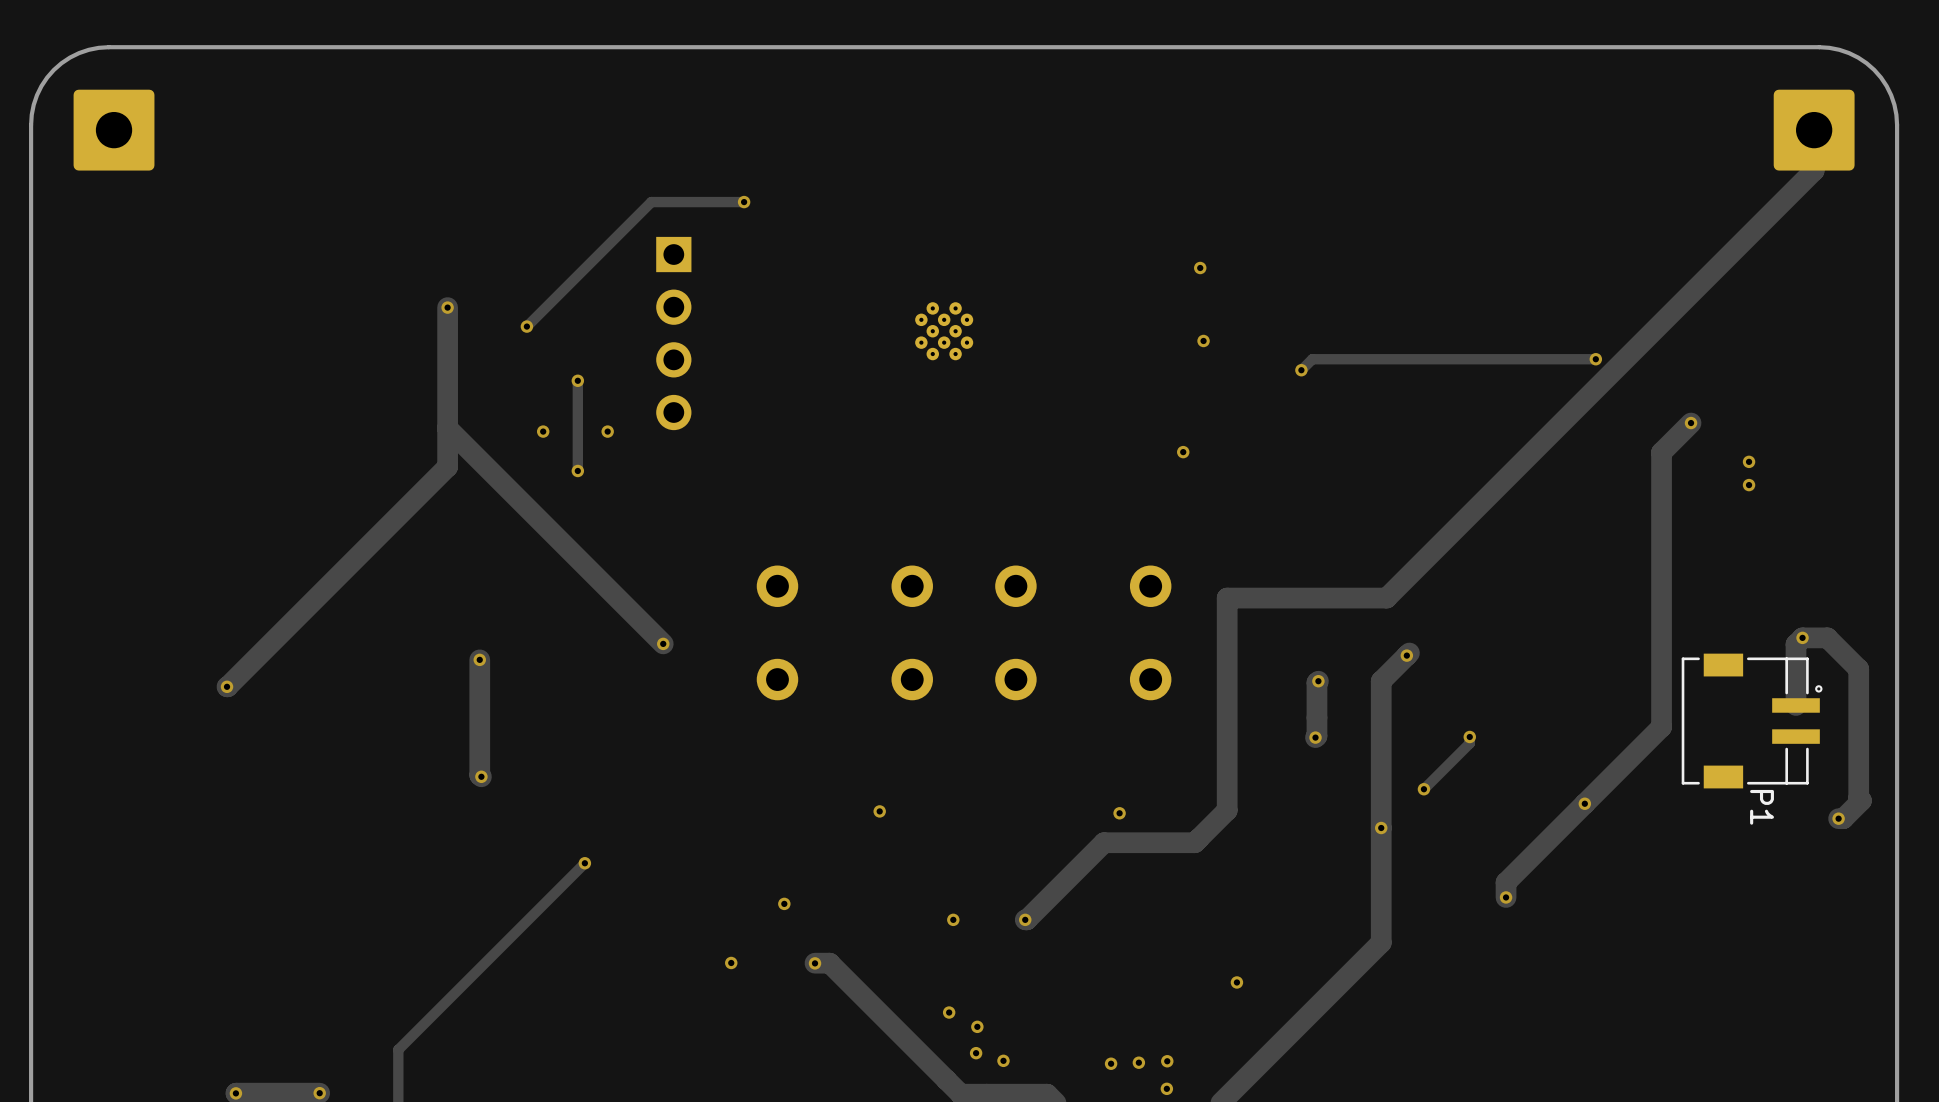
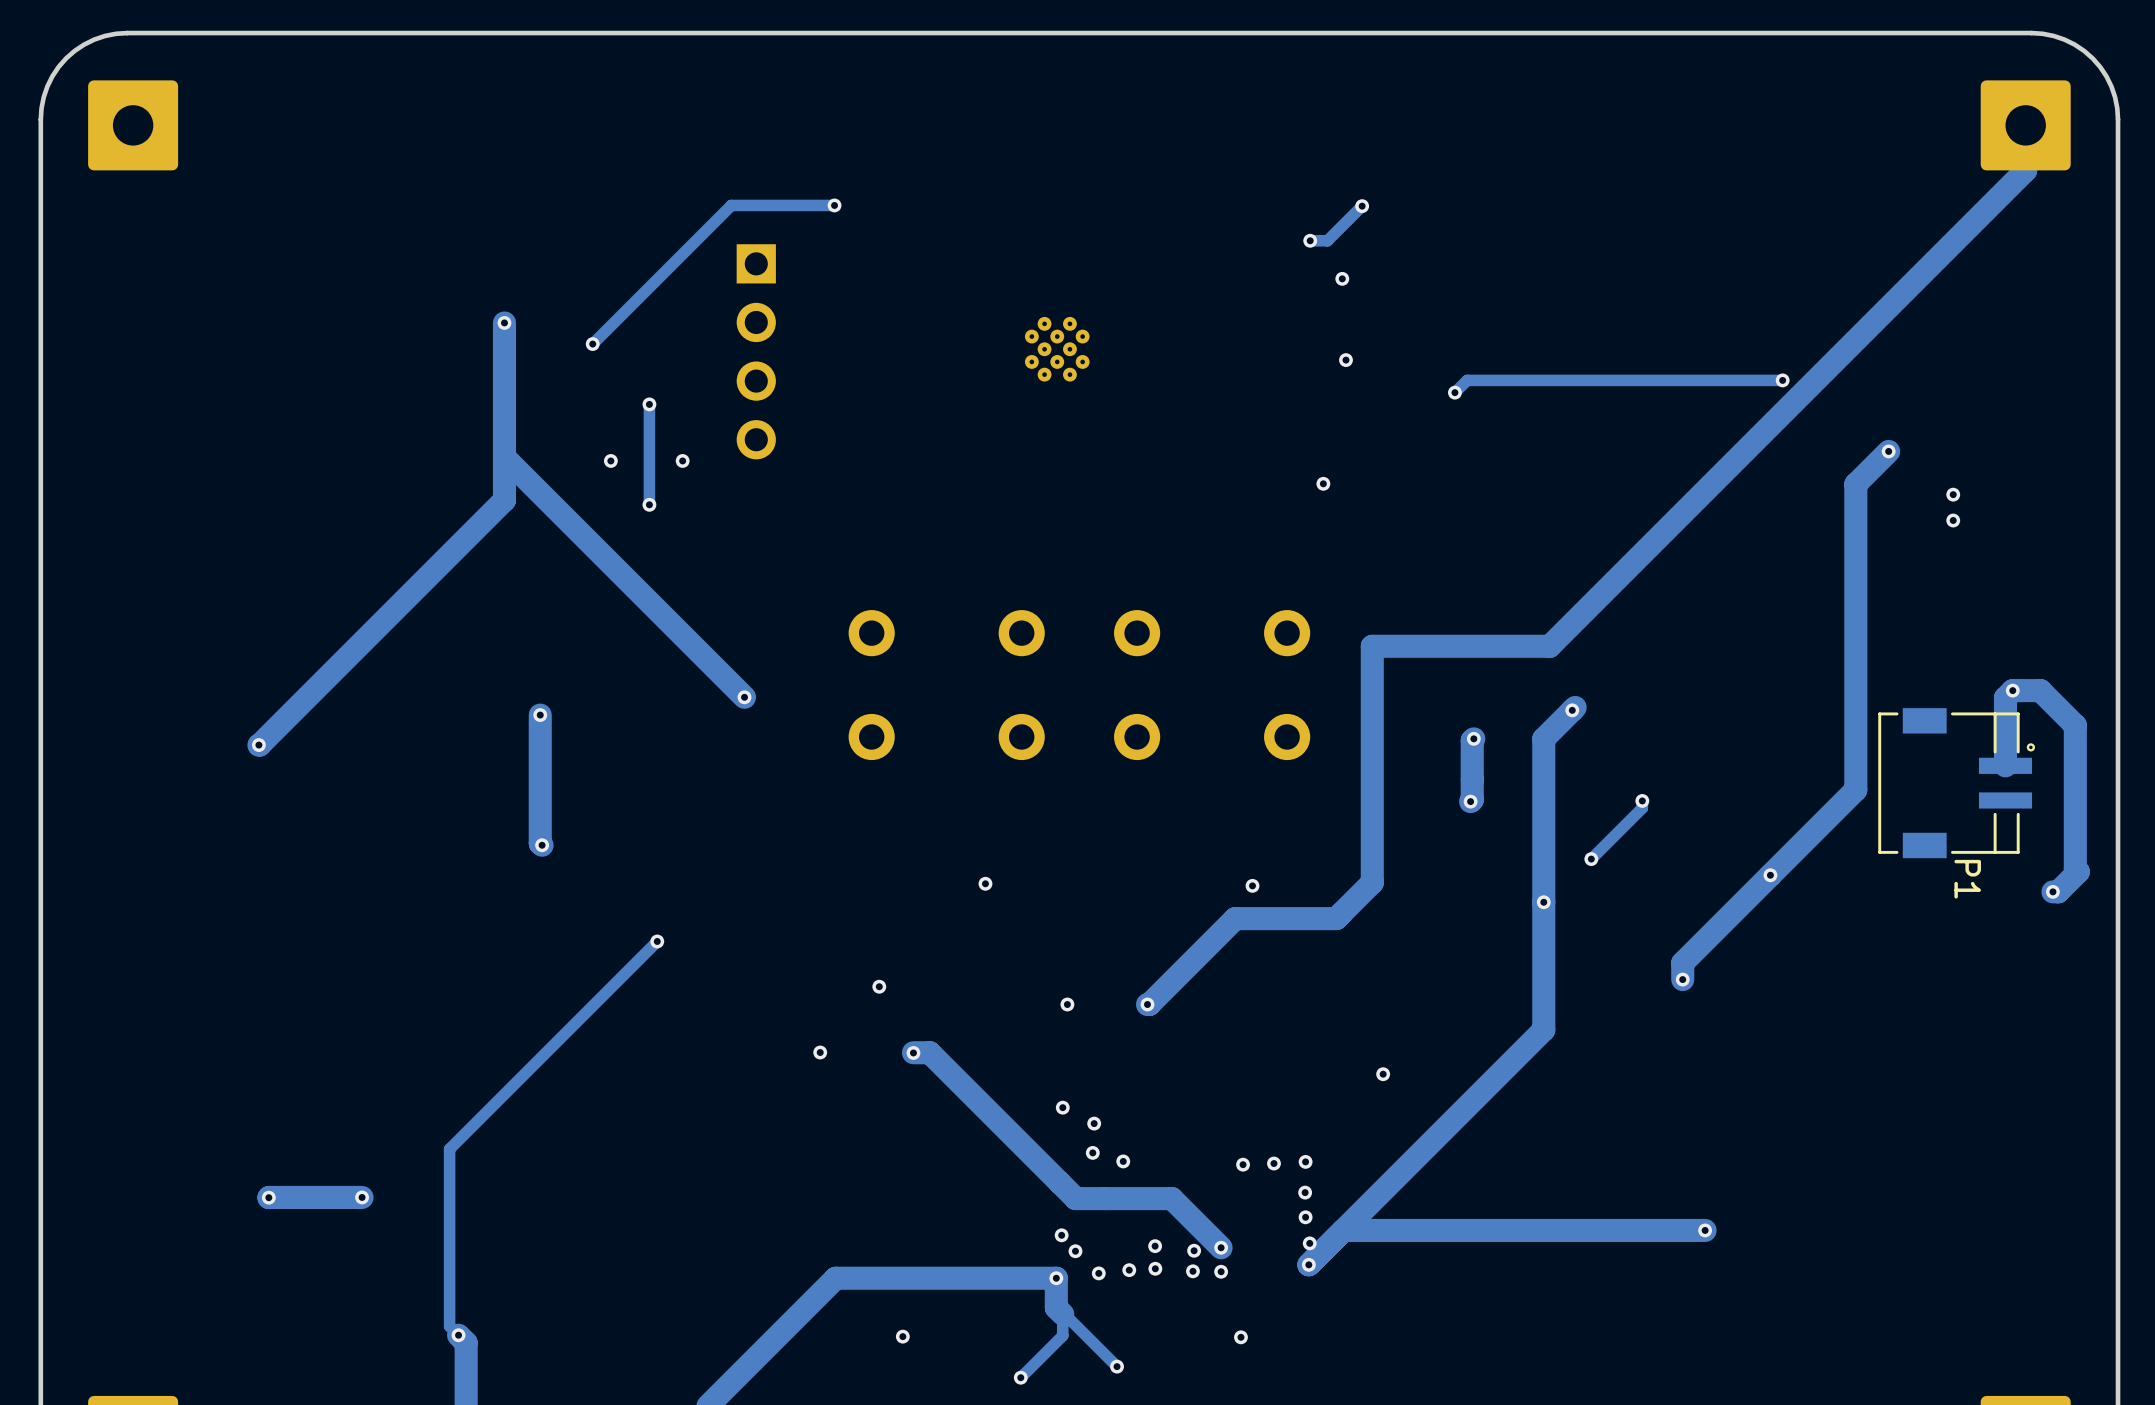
track: none -> (1362, 206) (1327, 240) (1310, 240)
via: none -> (1362, 206)
via: none -> (1310, 240)

